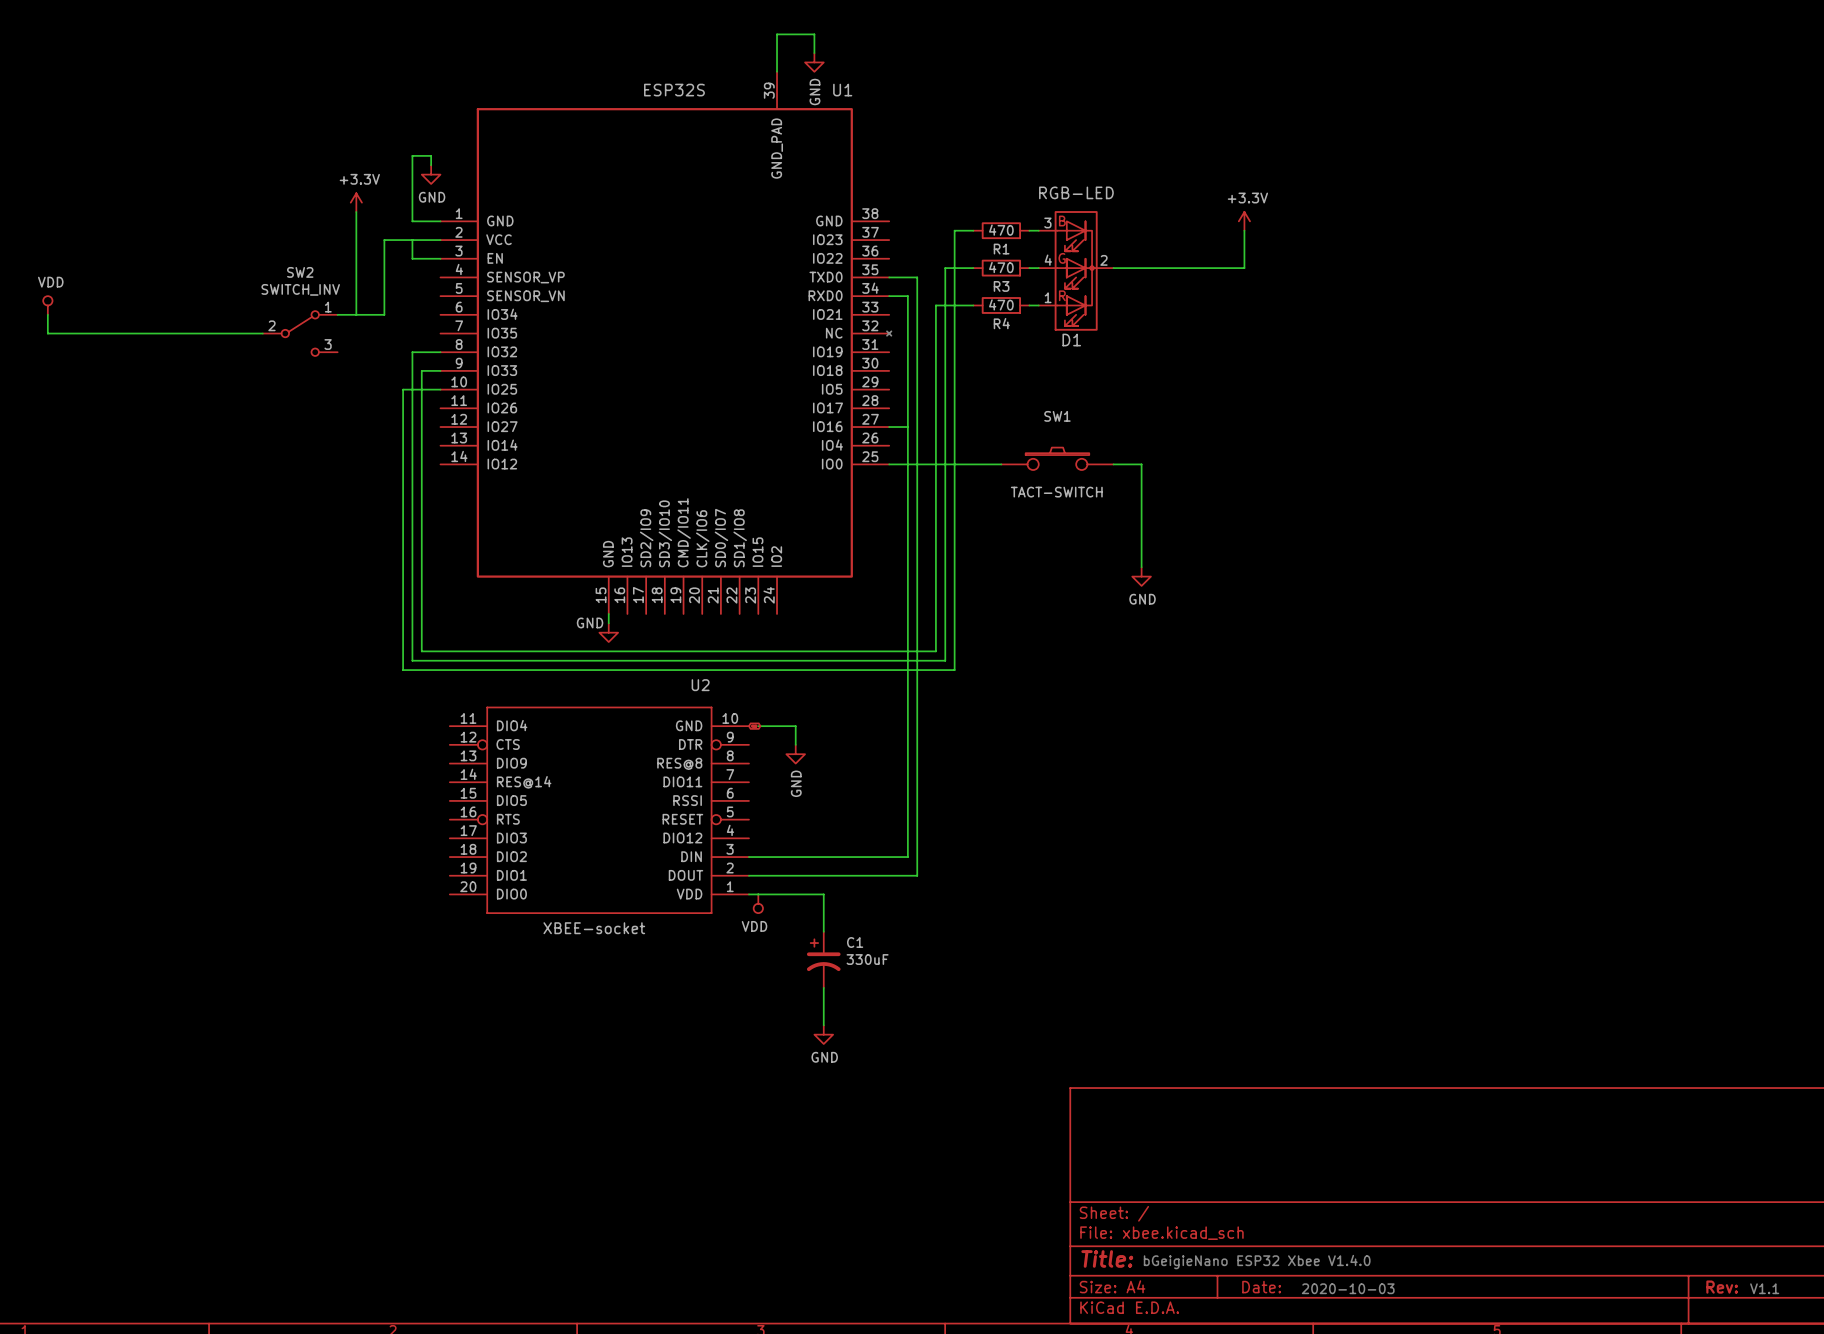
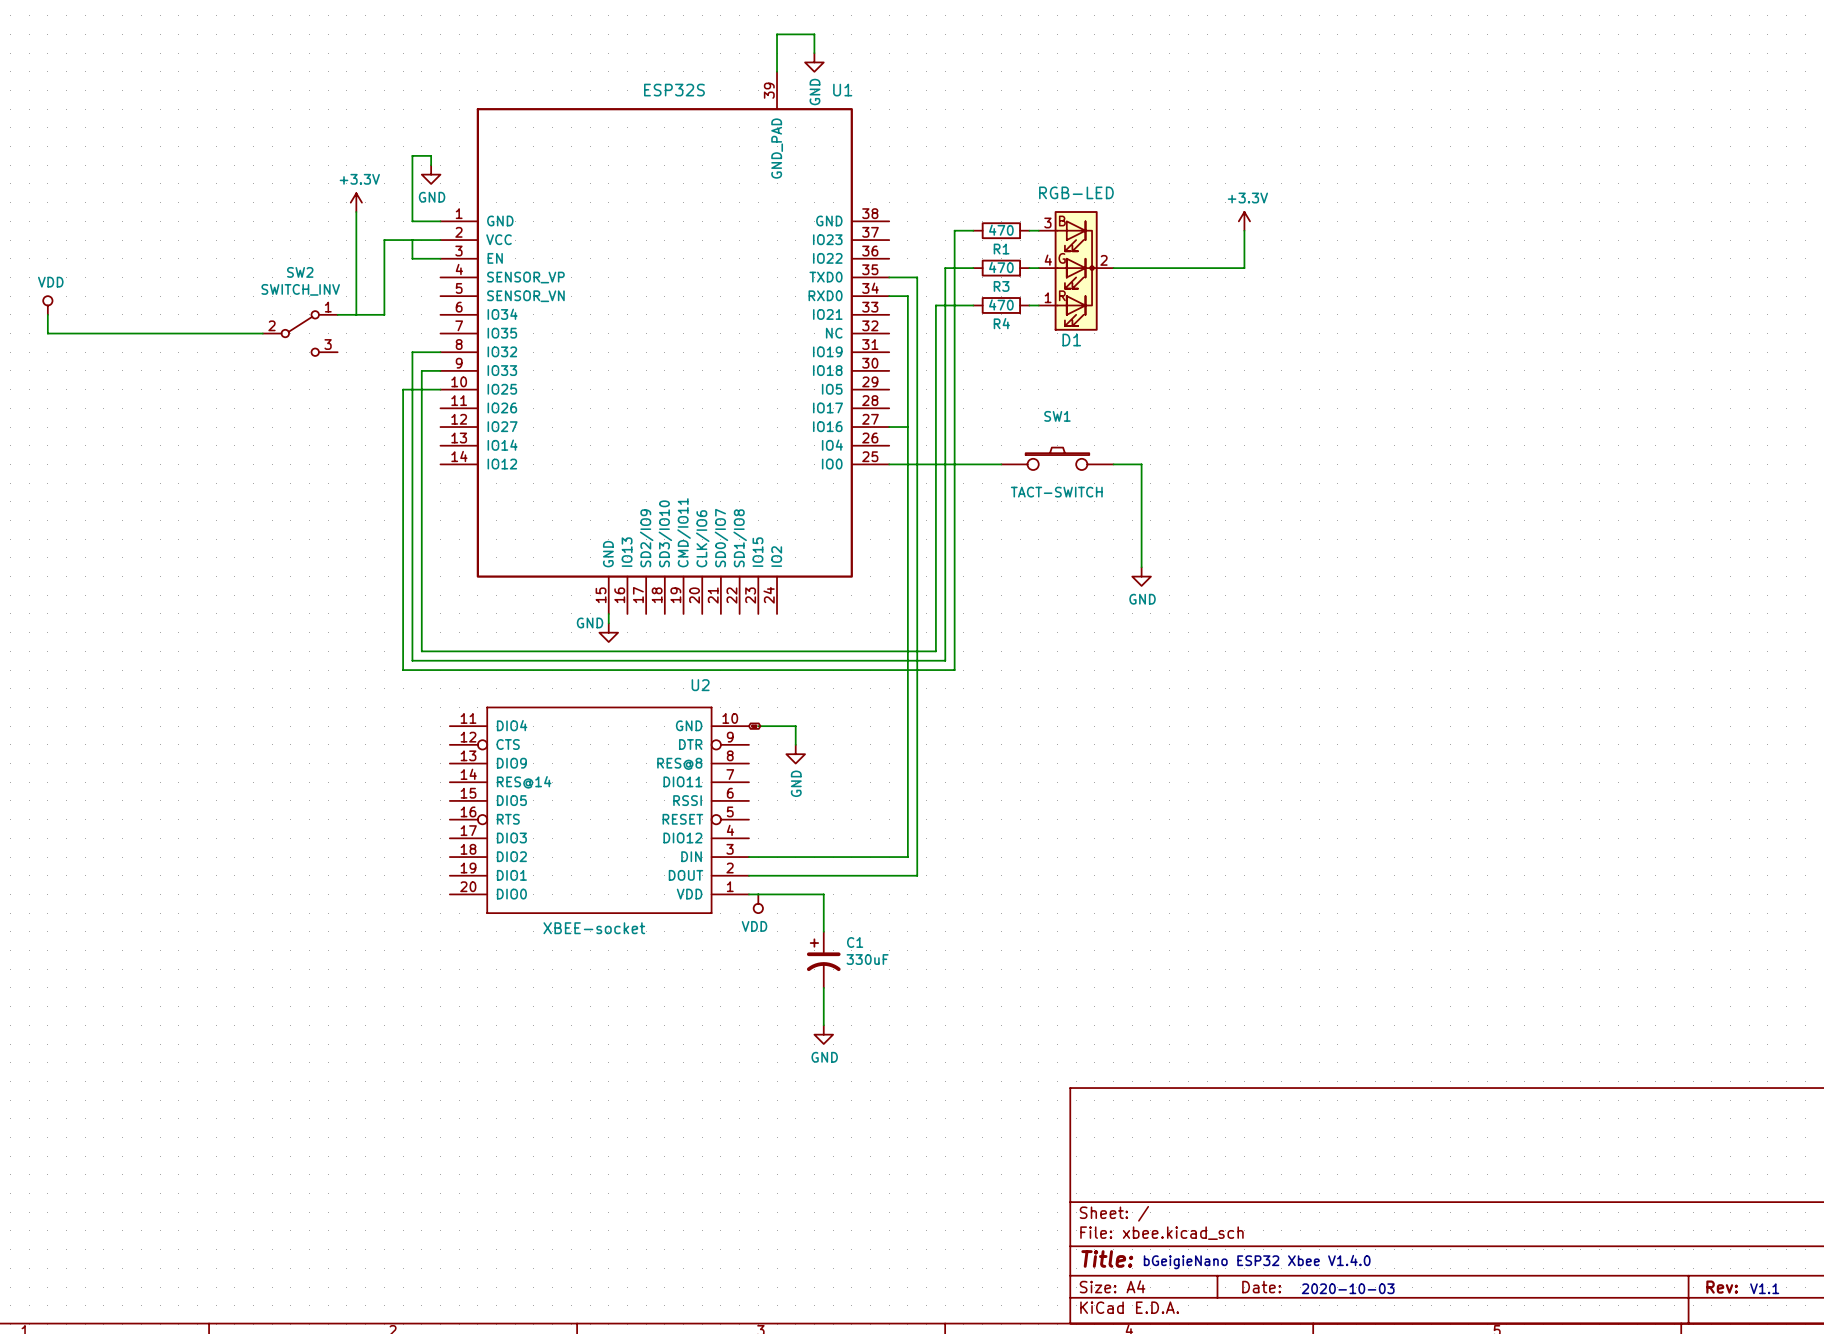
U1 symbol: [440, 71, 892, 614] -> [440, 71, 890, 614]

